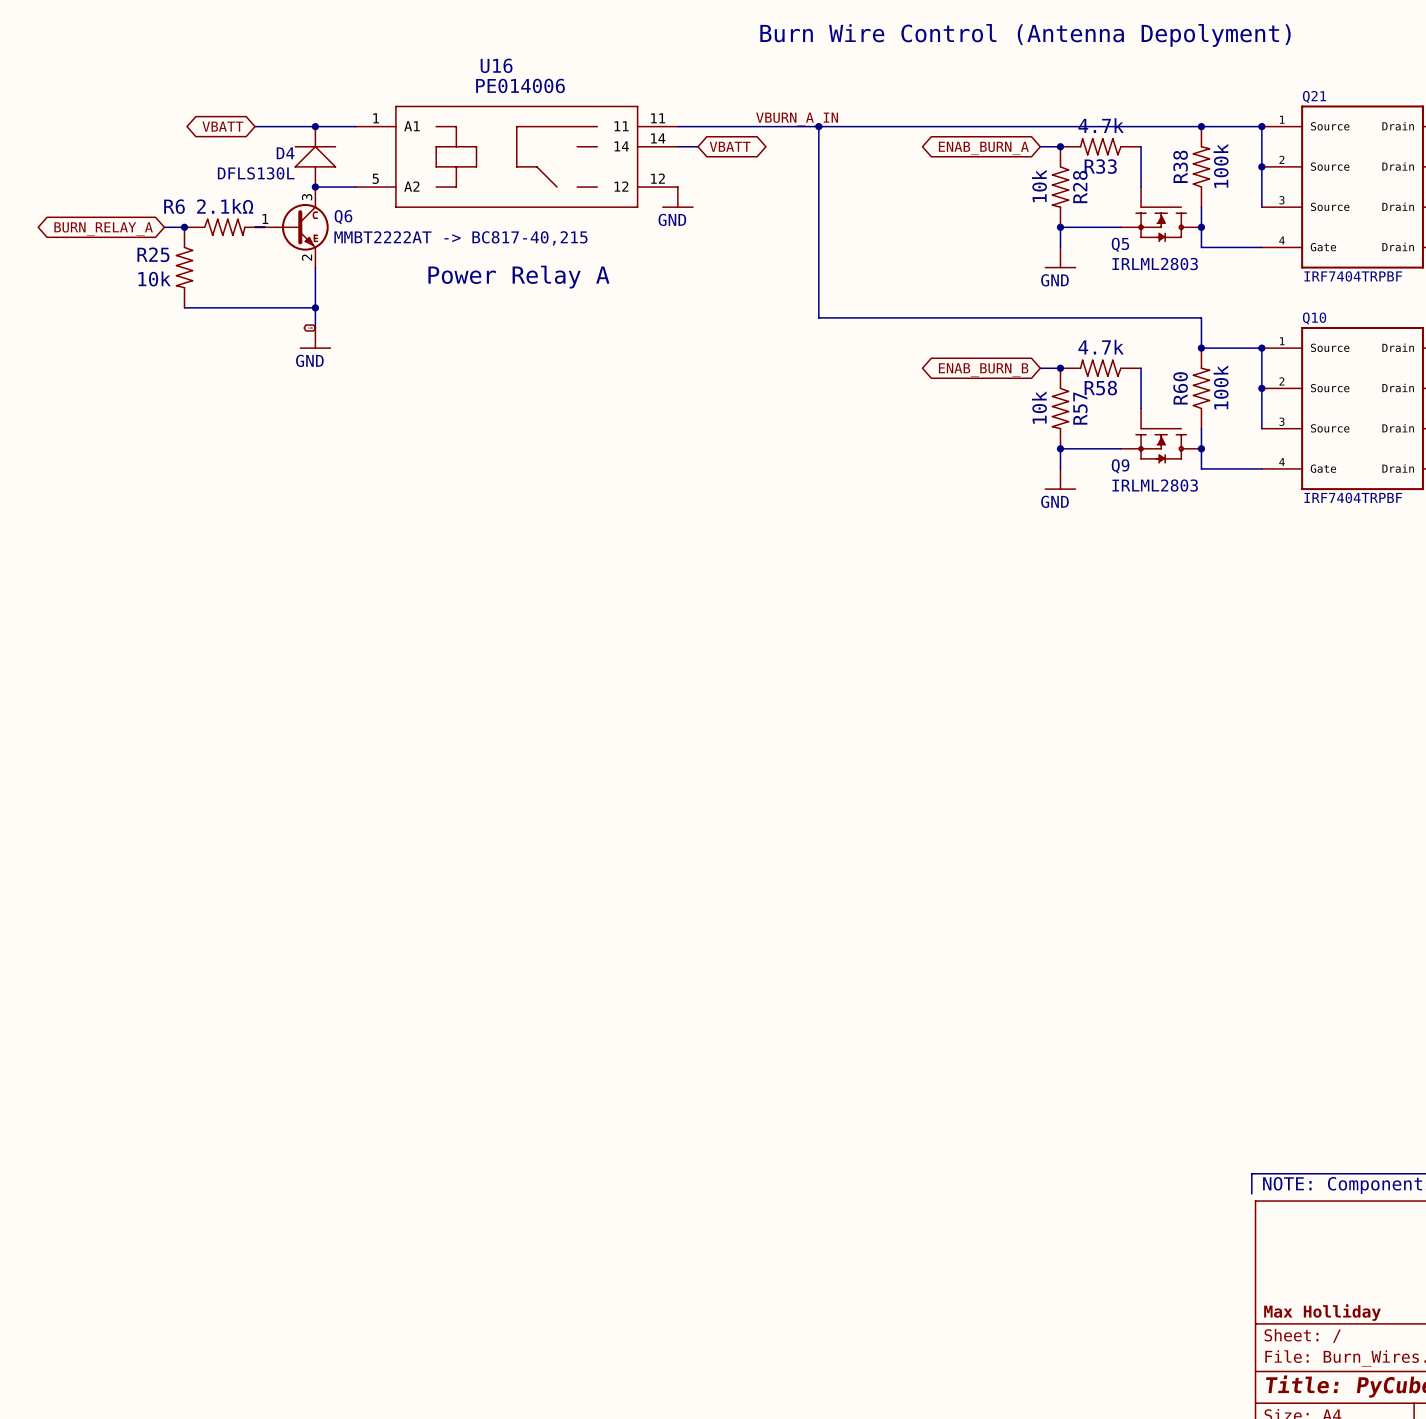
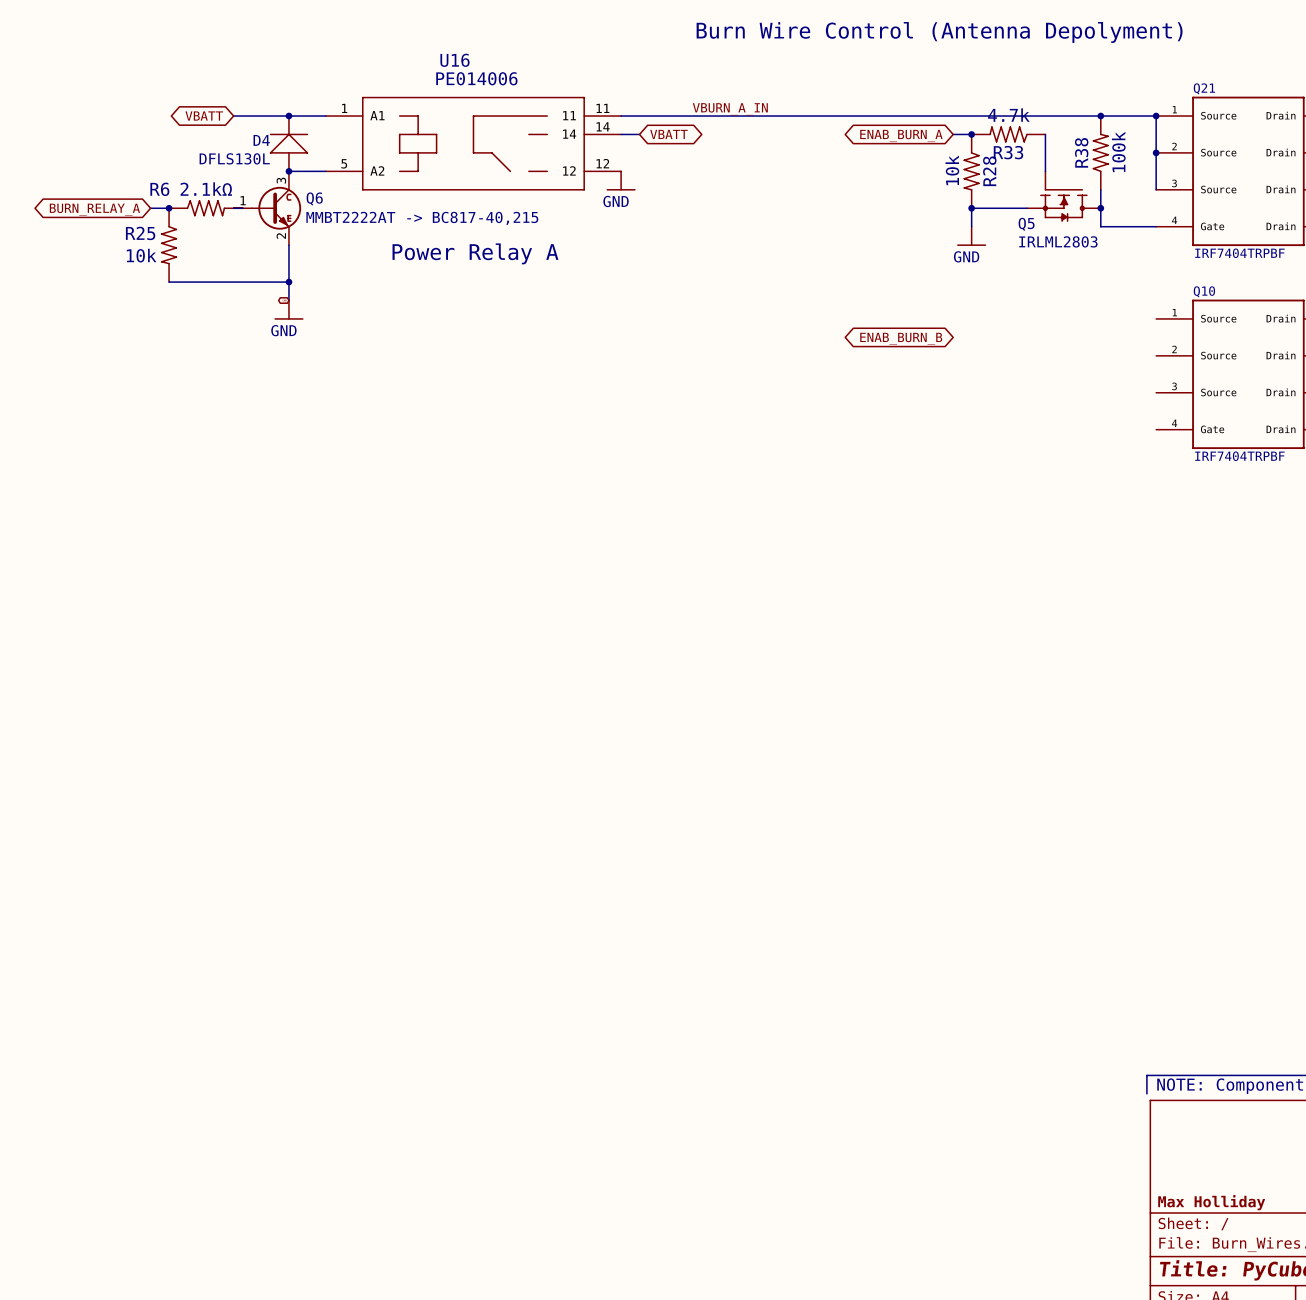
wire: (818, 126) (818, 317) (1201, 317) (1201, 348) (1261, 348) (1261, 428) -> none
junction: (818, 126) -> none
junction: (1201, 348) -> none
junction: (1261, 348) -> none
wire: (1040, 368) (1060, 368) -> none
junction: (1060, 368) -> none
R58: 4.7k (1100, 368) -> none
wire: (1141, 368) (1141, 408) -> none
R60: 100k (1201, 388) -> none
junction: (1261, 388) -> none
R57: 10k (1060, 408) -> none
wire: (1201, 428) (1201, 468) (1261, 468) -> none
Q9: IRLML2803 (1161, 435) -> none
junction: (1060, 448) -> none
wire: (1120, 448) (1060, 448) (1060, 468) -> none
junction: (1201, 448) -> none
power symbol: GND (1060, 479) -> none

